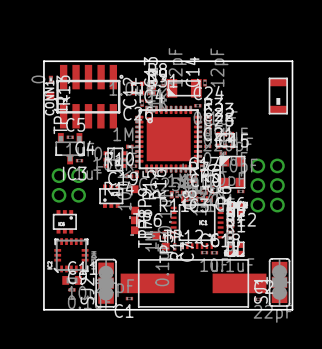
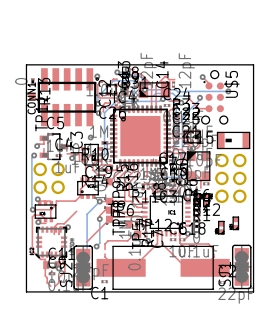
top track: none -> (127, 69) (134, 69)
via: none -> (127, 69)
bottom track: none -> (117, 72) (121, 72) (124, 75) (138, 75) (145, 81) (145, 89) (228, 91)
via: none -> (117, 72)
top track: none -> (134, 73) (141, 73) (151, 84) (151, 109)
via: none -> (97, 76)
top track: none -> (202, 77) (209, 85)
via: none -> (202, 77)
top track: none -> (117, 79) (111, 81)
top track: none -> (174, 79) (169, 79) (164, 76) (156, 85) (156, 109)
top track: none -> (103, 81) (97, 84) (97, 95) (100, 98) (119, 98) (118, 103)
via: none -> (145, 89)
via: none -> (228, 91)
U$5: none -> (214, 97)
part rotation: 0° (278, 96) -> 90° clockwise (233, 140)
part position: (278, 96) -> (233, 140)
via: none -> (119, 98)
top track: none -> (189, 97) (199, 108) (209, 108)
bottom track: none -> (189, 97) (175, 96) (172, 93) (139, 96) (134, 91) (134, 80) (113, 80) (97, 96) (97, 103)
bottom track: none -> (199, 97) (182, 117) (182, 169) (184, 175) (182, 177) (164, 177)
via: none -> (199, 97)
via: none -> (162, 99)
top track: none -> (169, 101) (179, 101)
top track: none -> (109, 103) (103, 104) (103, 111)
via: none -> (181, 102)
via: none -> (97, 103)
top track: none -> (174, 105) (167, 115)
top track: none -> (108, 107) (118, 107) (120, 109)
via: none -> (98, 113)
top track: none -> (193, 130) (189, 133) (167, 133)
via: none -> (90, 137)
top track: none -> (44, 138) (43, 144) (37, 146)
top track: none -> (167, 138) (189, 138) (193, 141)
top track: none -> (199, 141) (197, 148) (192, 148)
IC3 rotation: 0° (70, 148) -> 90° counterclockwise (53, 146)
top track: none -> (187, 144) (192, 148)
via: none -> (37, 146)
top track: none -> (167, 147) (181, 149) (187, 161)
top track: none -> (43, 148) (44, 155)
via: none -> (193, 148)
top track: none -> (167, 151) (180, 154) (180, 167) (185, 172) (193, 172) (201, 180) (200, 188)
top track: none -> (67, 153) (78, 153) (79, 160)
top track: none -> (92, 154) (85, 160) (85, 184) (80, 189) (80, 196) (75, 201) (56, 201) (56, 204) (50, 210)
bottom track: none -> (103, 154) (104, 112) (119, 98) (122, 101) (159, 101) (161, 99) (170, 99) (176, 104) (177, 143) (173, 147) (173, 161)
bottom track: none -> (34, 155) (31, 157) (32, 209)
via: none -> (34, 155)
via: none -> (72, 158)
top track: none -> (96, 160) (92, 164) (92, 169) (97, 174) (105, 174)
top track: none -> (120, 162) (120, 166) (116, 170) (105, 170)
top track: none -> (124, 162) (124, 166) (112, 178)
top track: none -> (129, 162) (129, 167) (117, 179)
top track: none -> (133, 162) (133, 171) (124, 180) (125, 201)
top track: none -> (138, 162) (138, 173) (129, 182) (129, 195) (133, 197) (140, 203) (144, 203)
top track: none -> (147, 162) (147, 177)
top track: none -> (111, 165) (101, 164) (99, 167)
top track: none -> (37, 199) (39, 201) (50, 201)
via: none -> (37, 199)
top track: none -> (99, 201) (131, 201) (137, 207) (144, 207)
bottom track: none -> (99, 201) (87, 214) (87, 256)
via: none -> (99, 201)
top track: none -> (32, 209) (50, 210)
via: none -> (32, 209)
top track: none -> (50, 210) (50, 218)
top track: none -> (76, 211) (64, 223) (57, 223) (54, 227) (54, 234)
top track: none -> (144, 212) (111, 212) (105, 210) (99, 215) (99, 219)
top track: none -> (144, 216) (112, 216) (86, 242)
top track: none -> (44, 218) (41, 215) (32, 217) (32, 251) (40, 259) (45, 259) (45, 275) (50, 286)
bottom track: none -> (99, 219) (99, 243) (96, 246)
via: none -> (99, 219)
top track: none -> (38, 222) (45, 223)
via: none -> (38, 222)
top track: none -> (68, 227) (60, 227) (58, 234)
via: none -> (68, 227)
top track: none -> (157, 233) (157, 243) (131, 269) (117, 269) (105, 256) (105, 253)
top track: none -> (161, 233) (161, 243) (187, 269) (201, 269) (214, 256) (214, 253)
top track: none -> (179, 233) (180, 244) (208, 244) (214, 249)
top track: none -> (187, 233) (184, 239)
via: none -> (187, 233)
top track: none -> (132, 236) (127, 240) (108, 240) (105, 244) (105, 249)
part position: (231, 249) -> (221, 227)
part position: (240, 249) -> (235, 223)
via: none -> (147, 240)
via: none -> (96, 246)
top track: none -> (63, 259) (64, 271) (58, 277) (58, 282) (55, 286)
via: none -> (58, 268)

